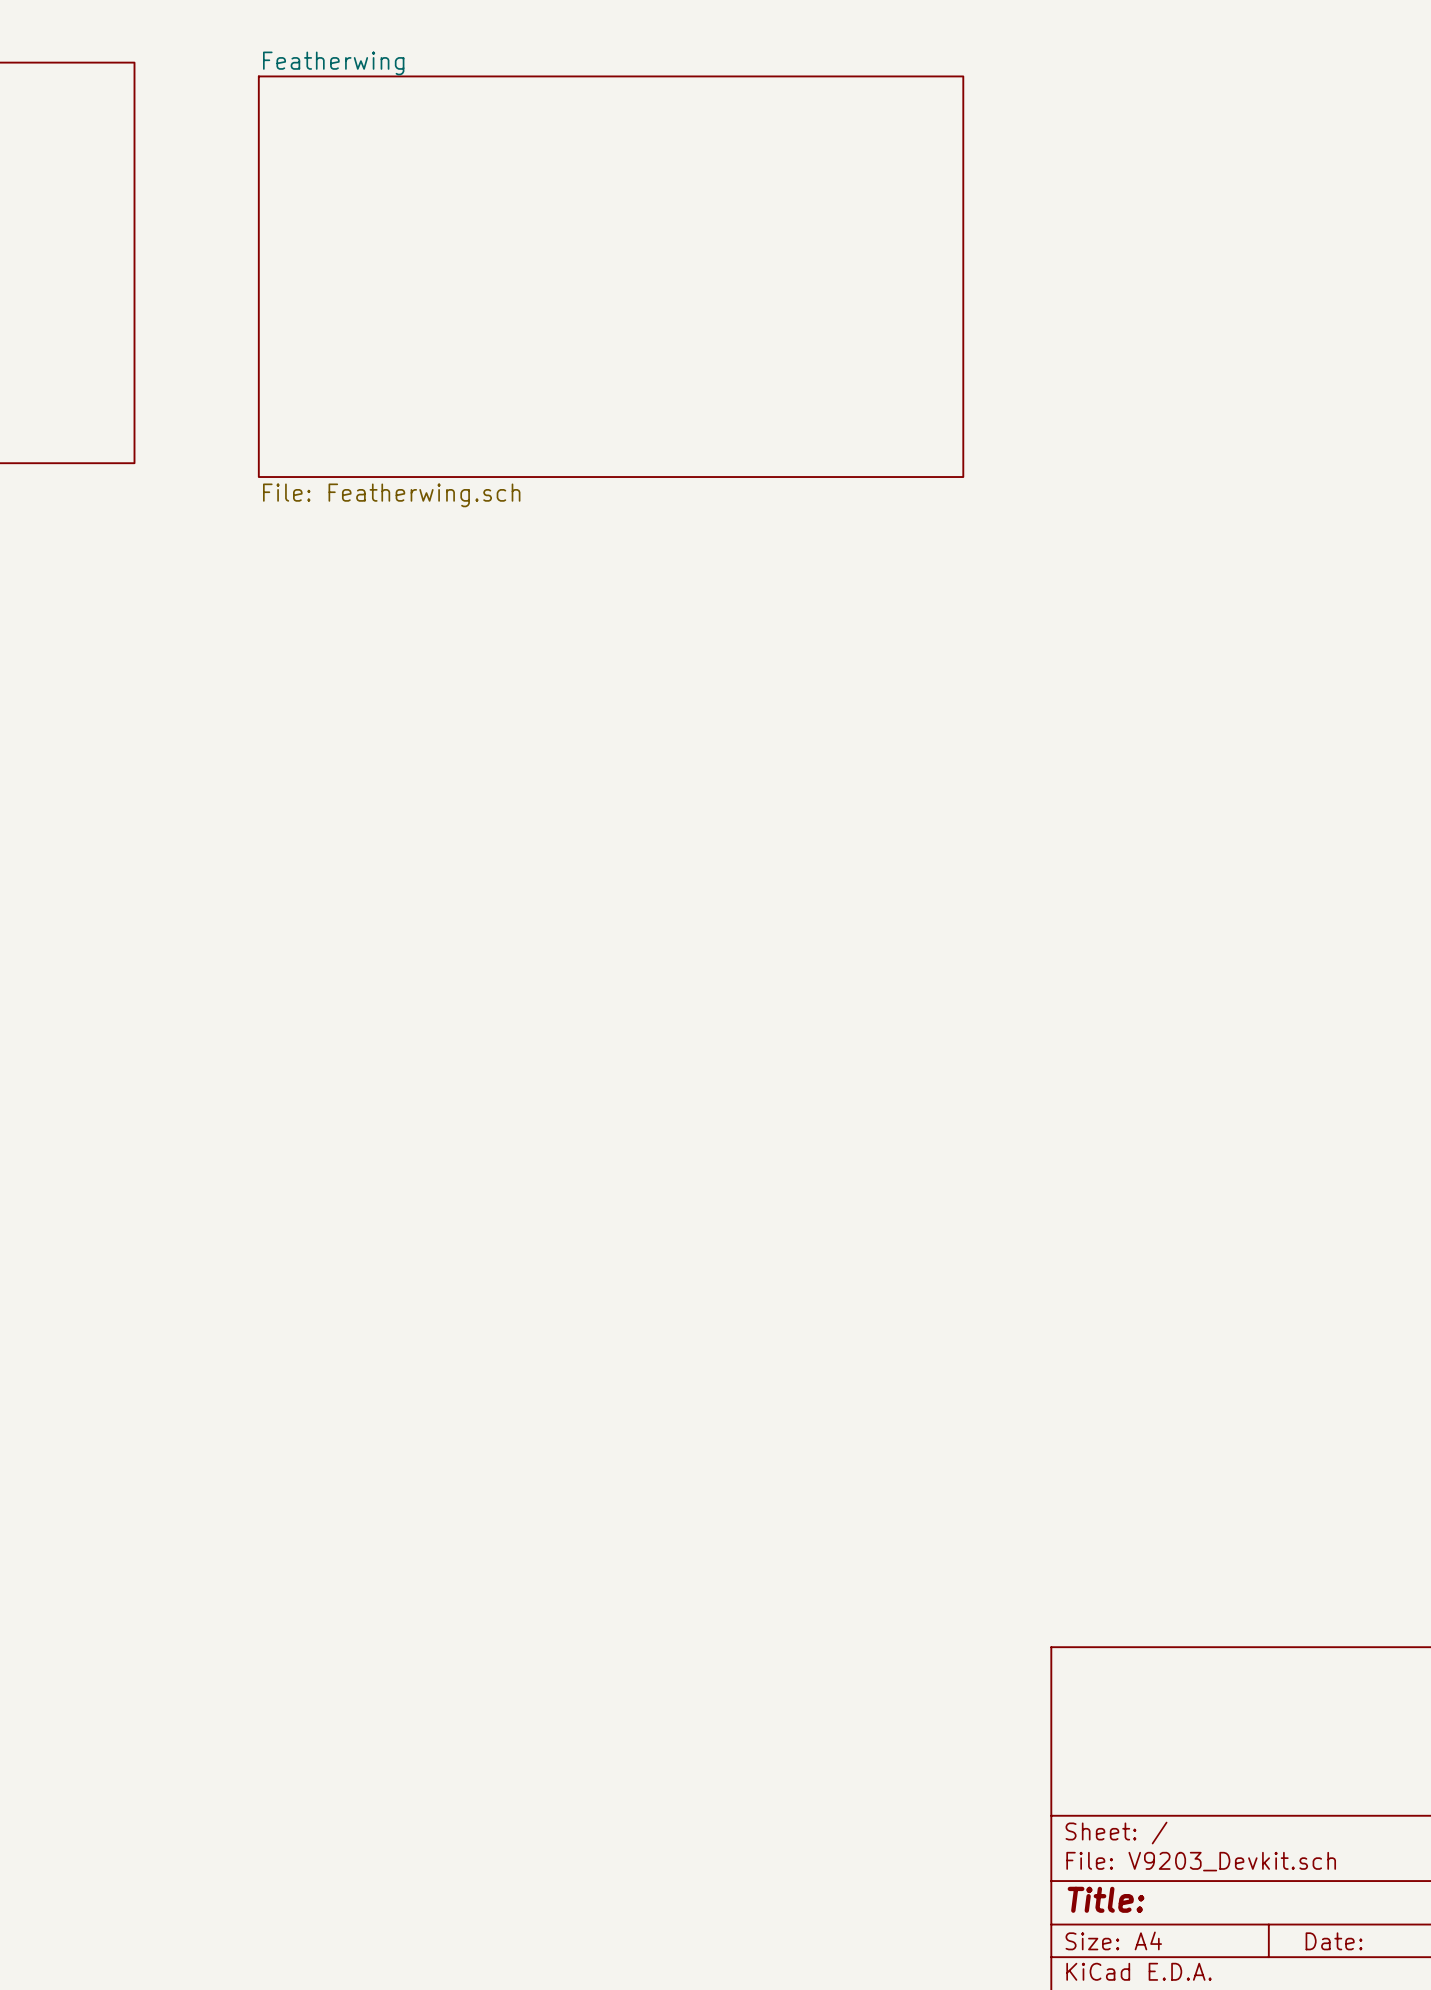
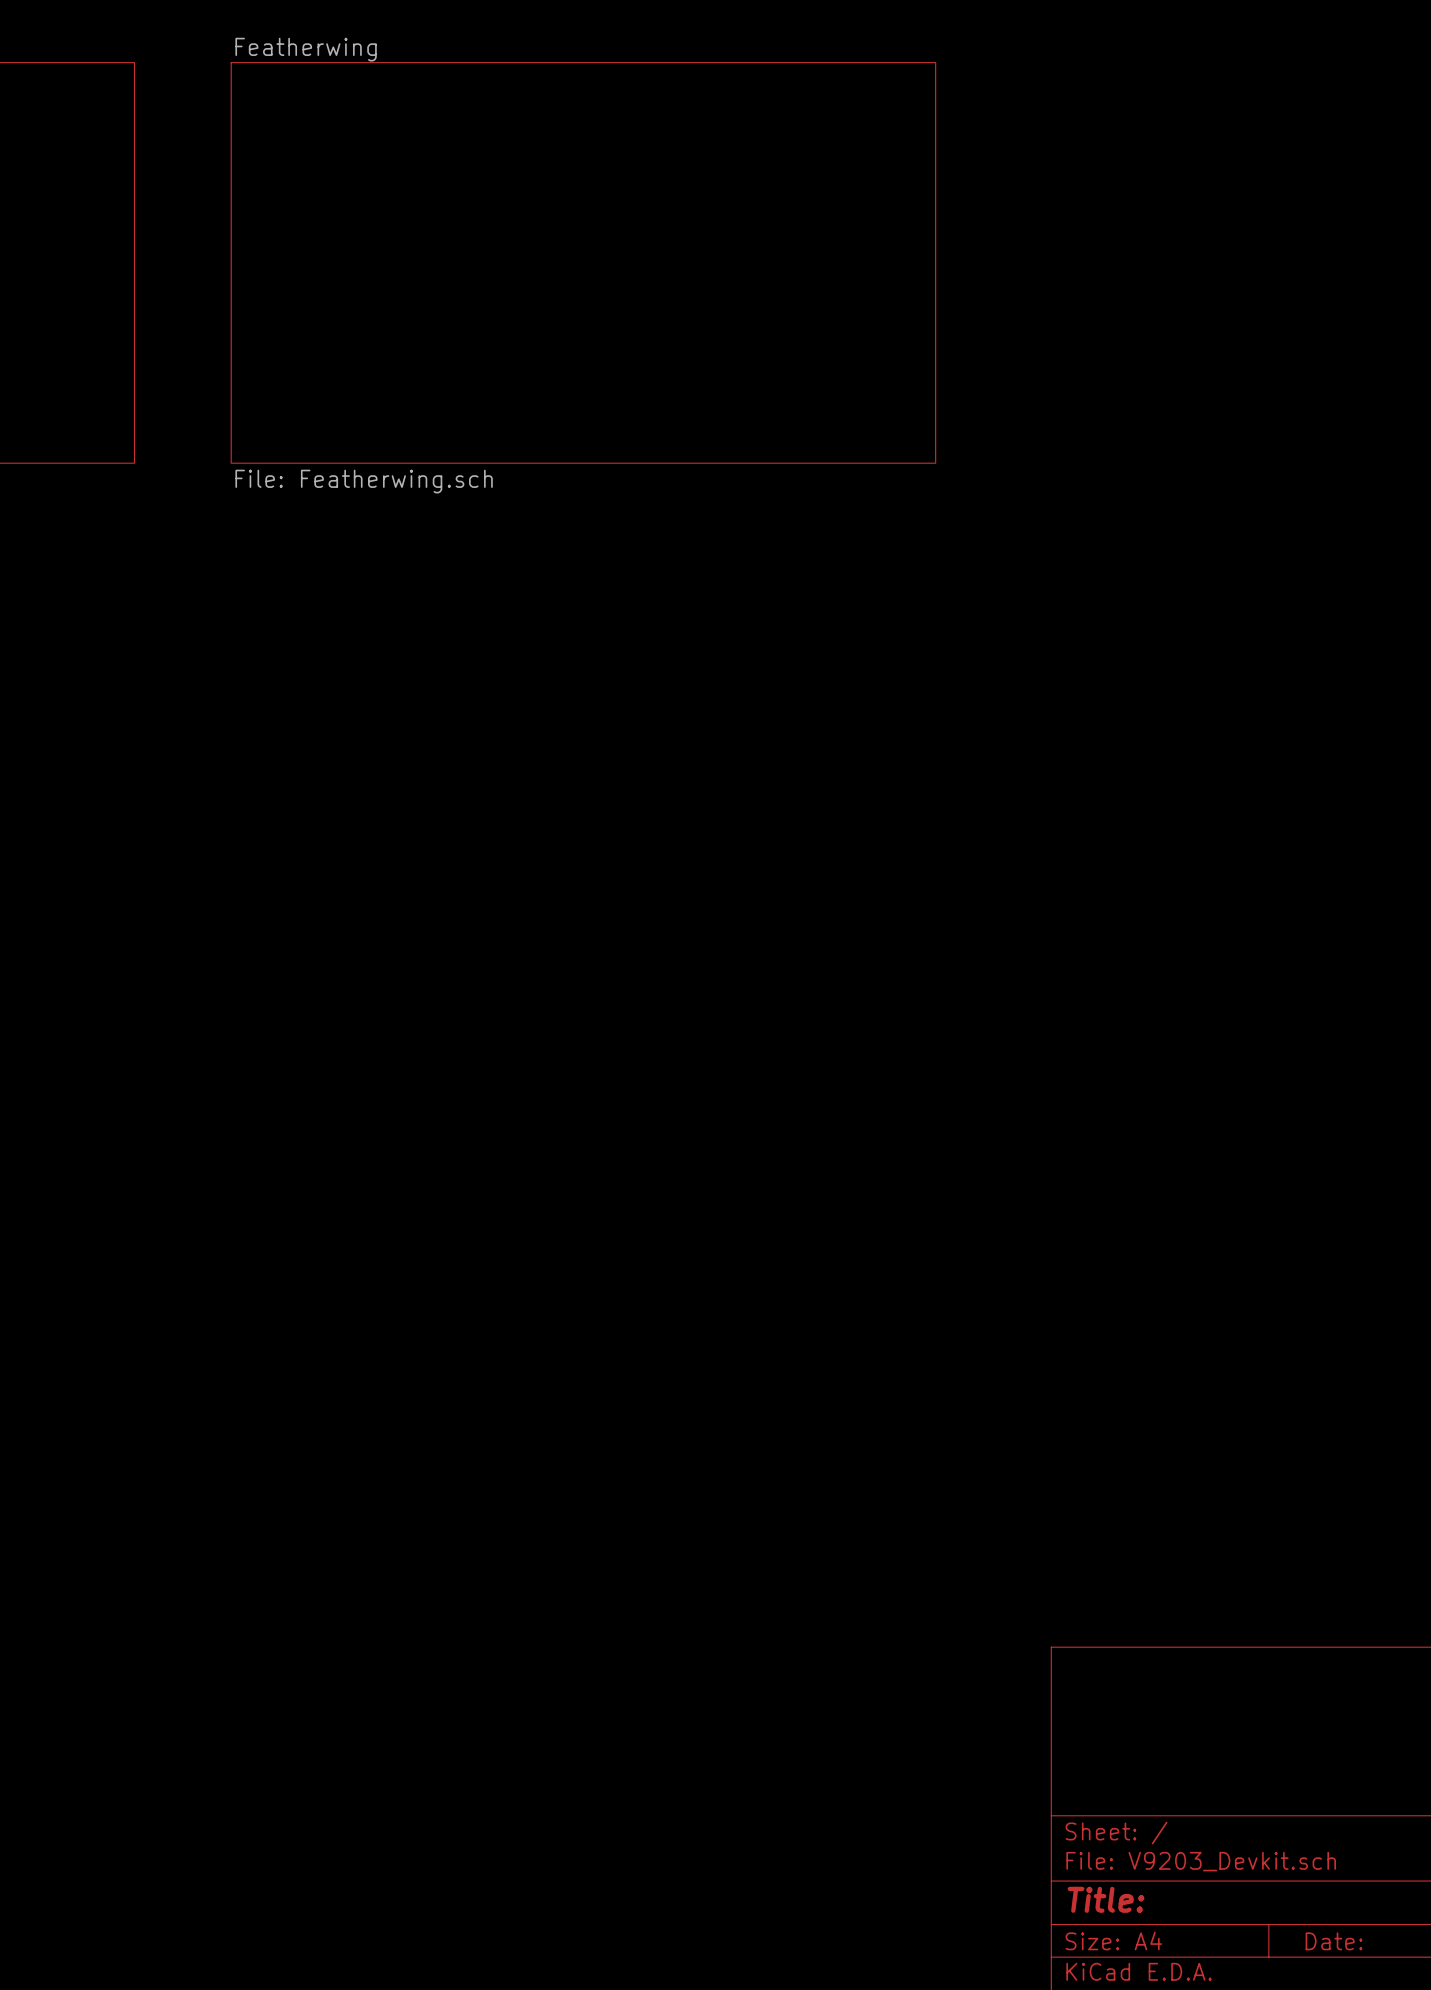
sheet Featherwing position: (611, 276) -> (583, 262)

